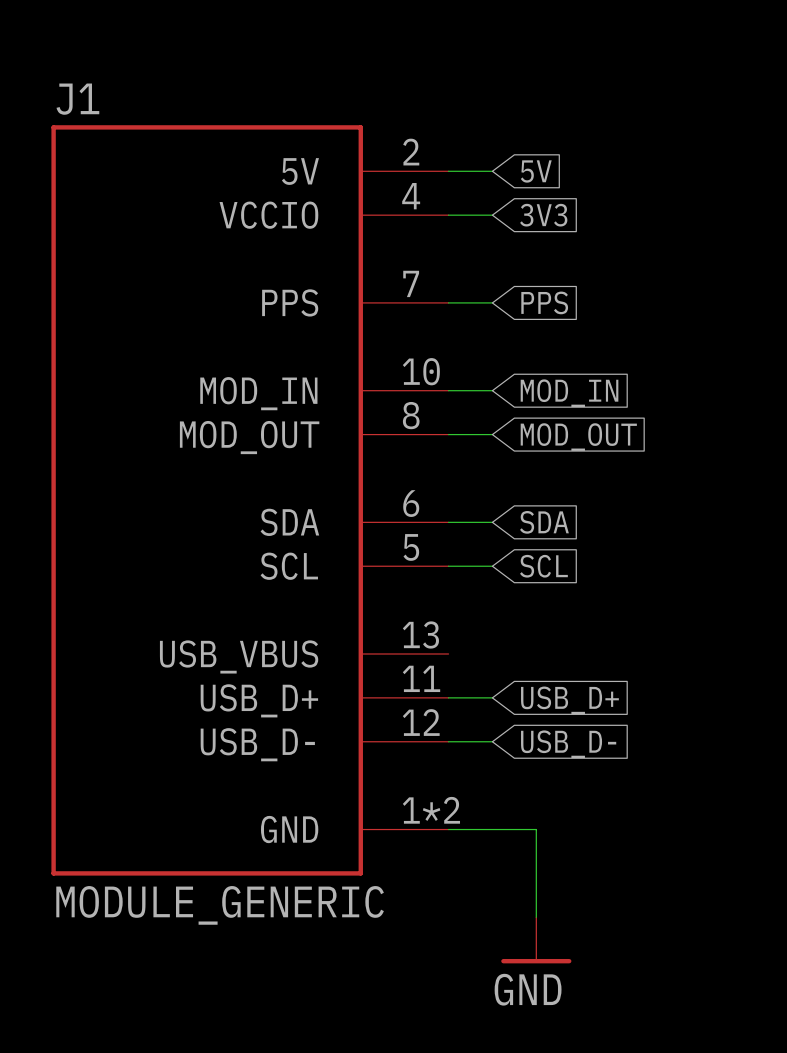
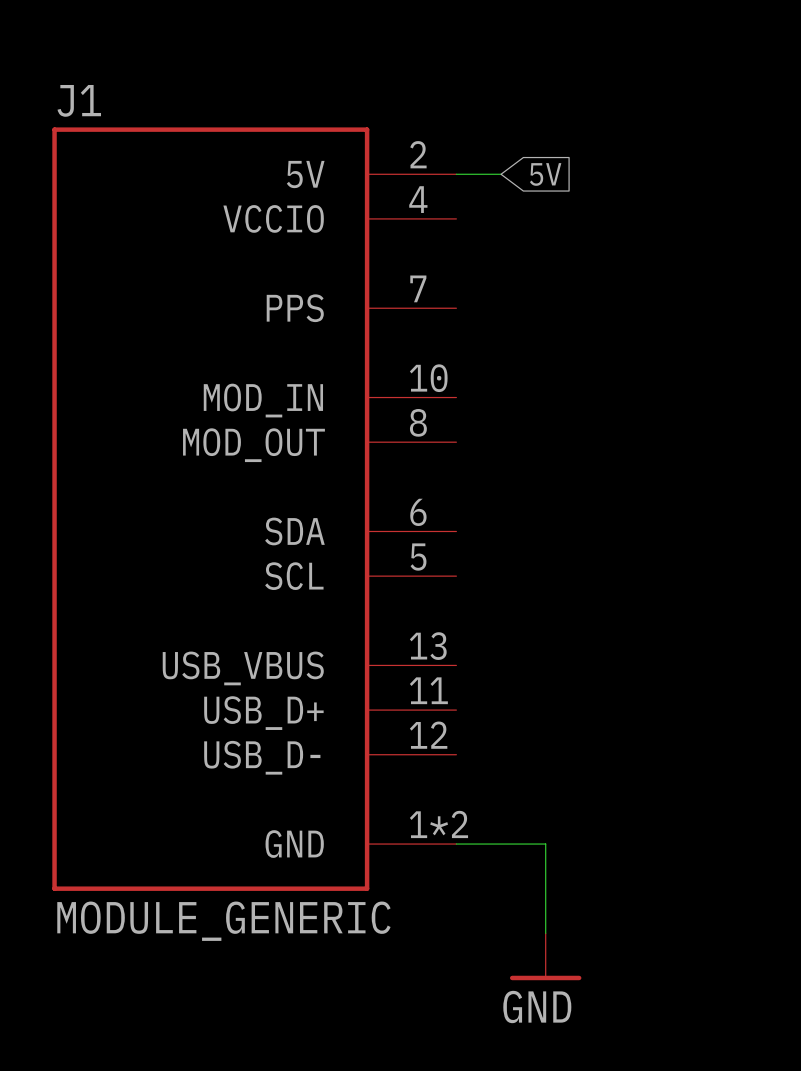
wire: (448, 215) (492, 215) -> none
global label: 3V3 (543, 215) -> none
wire: (448, 302) (492, 302) -> none
global label: PPS (544, 302) -> none
wire: (448, 390) (492, 390) -> none
global label: MOD_IN (569, 393) -> none
wire: (448, 434) (492, 434) -> none
global label: MOD_OUT (578, 437) -> none
wire: (448, 522) (492, 522) -> none
global label: SDA (544, 522) -> none
wire: (448, 566) (492, 566) -> none
global label: SCL (543, 566) -> none
wire: (448, 697) (492, 697) -> none
global label: USB_D+ (569, 700) -> none
wire: (448, 741) (492, 741) -> none
global label: USB_D- (568, 744) -> none

